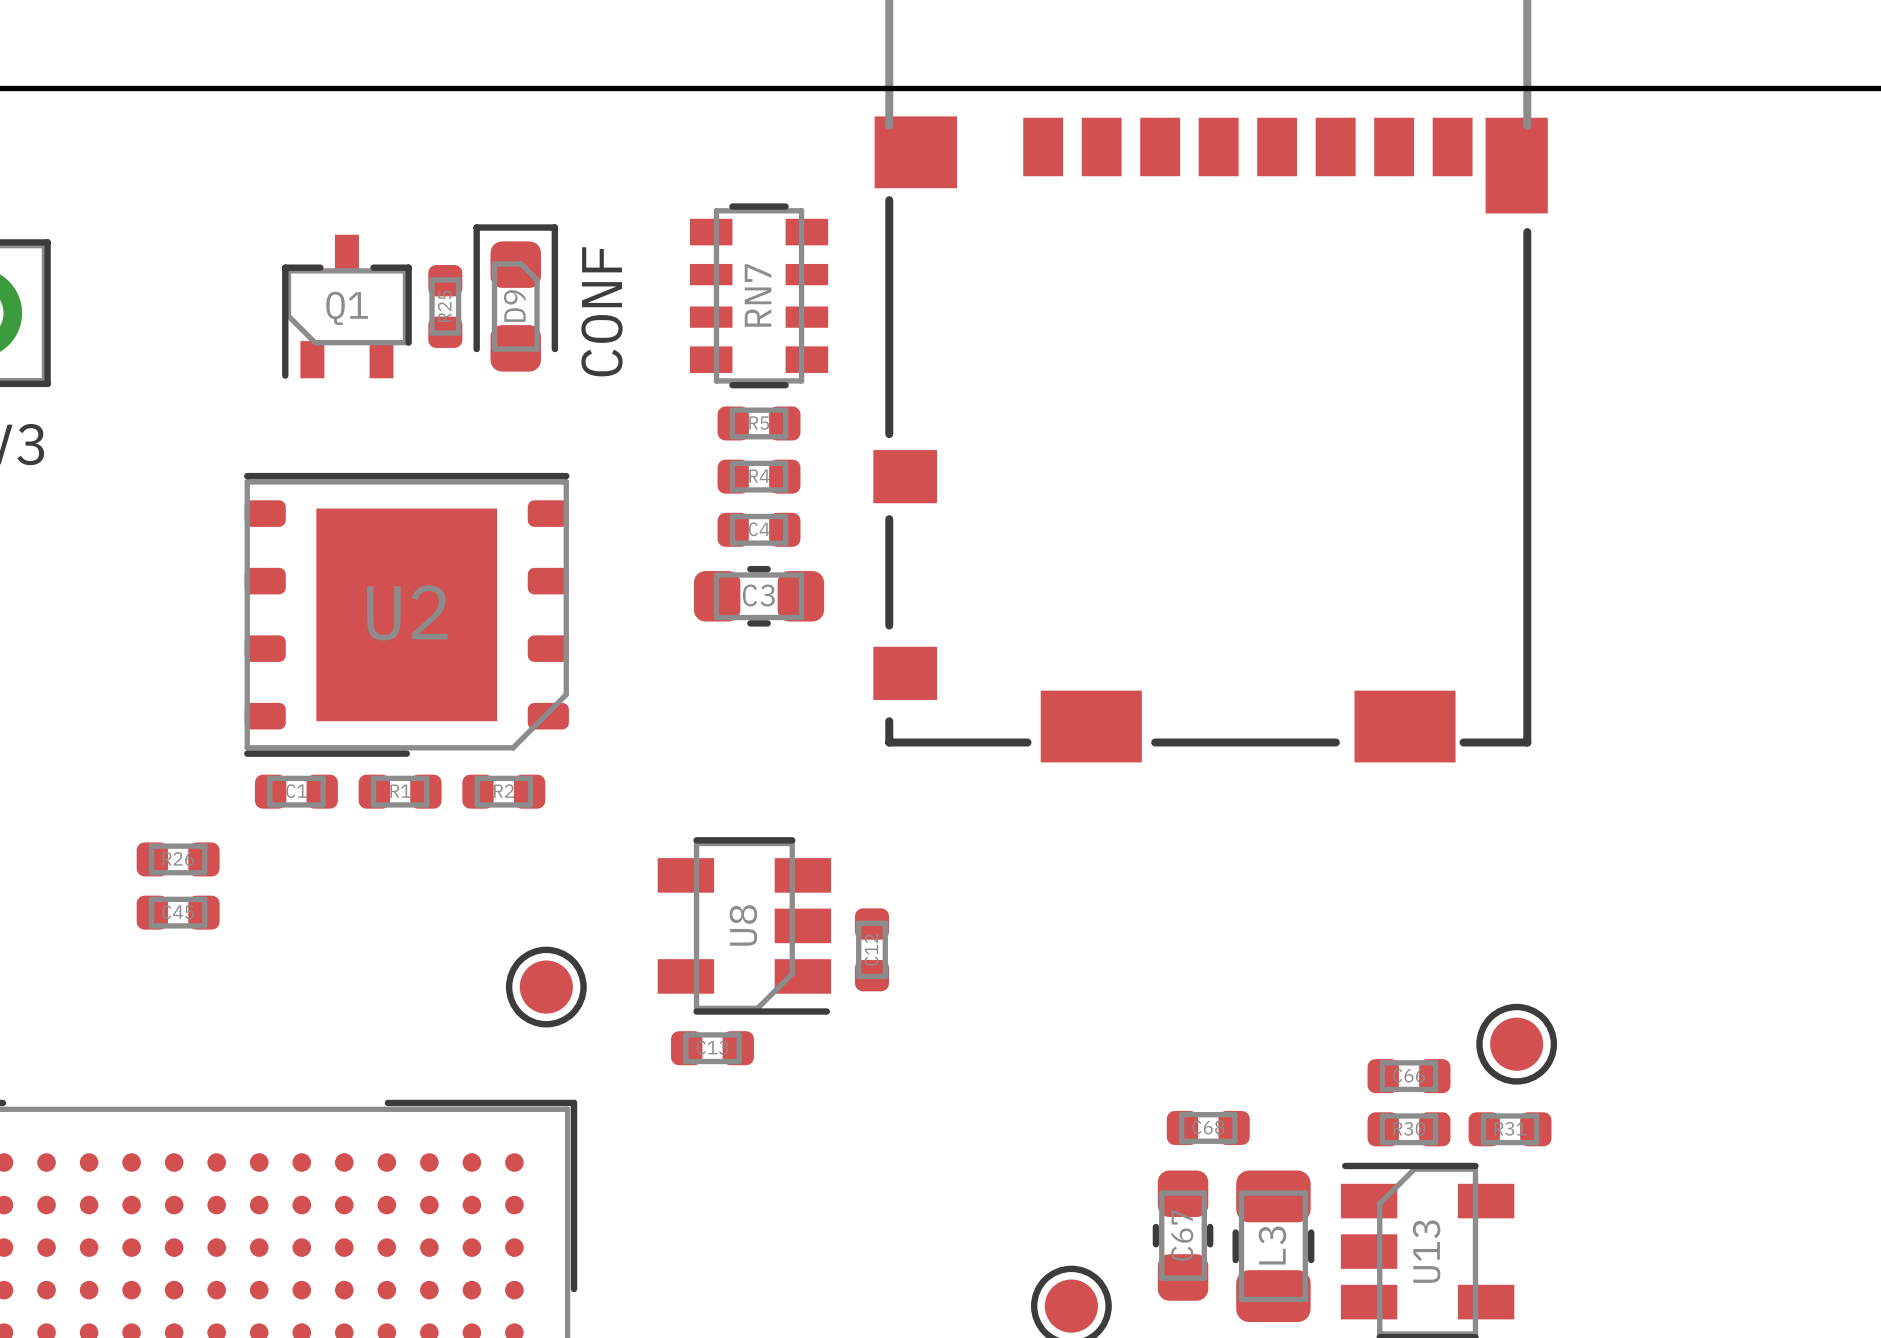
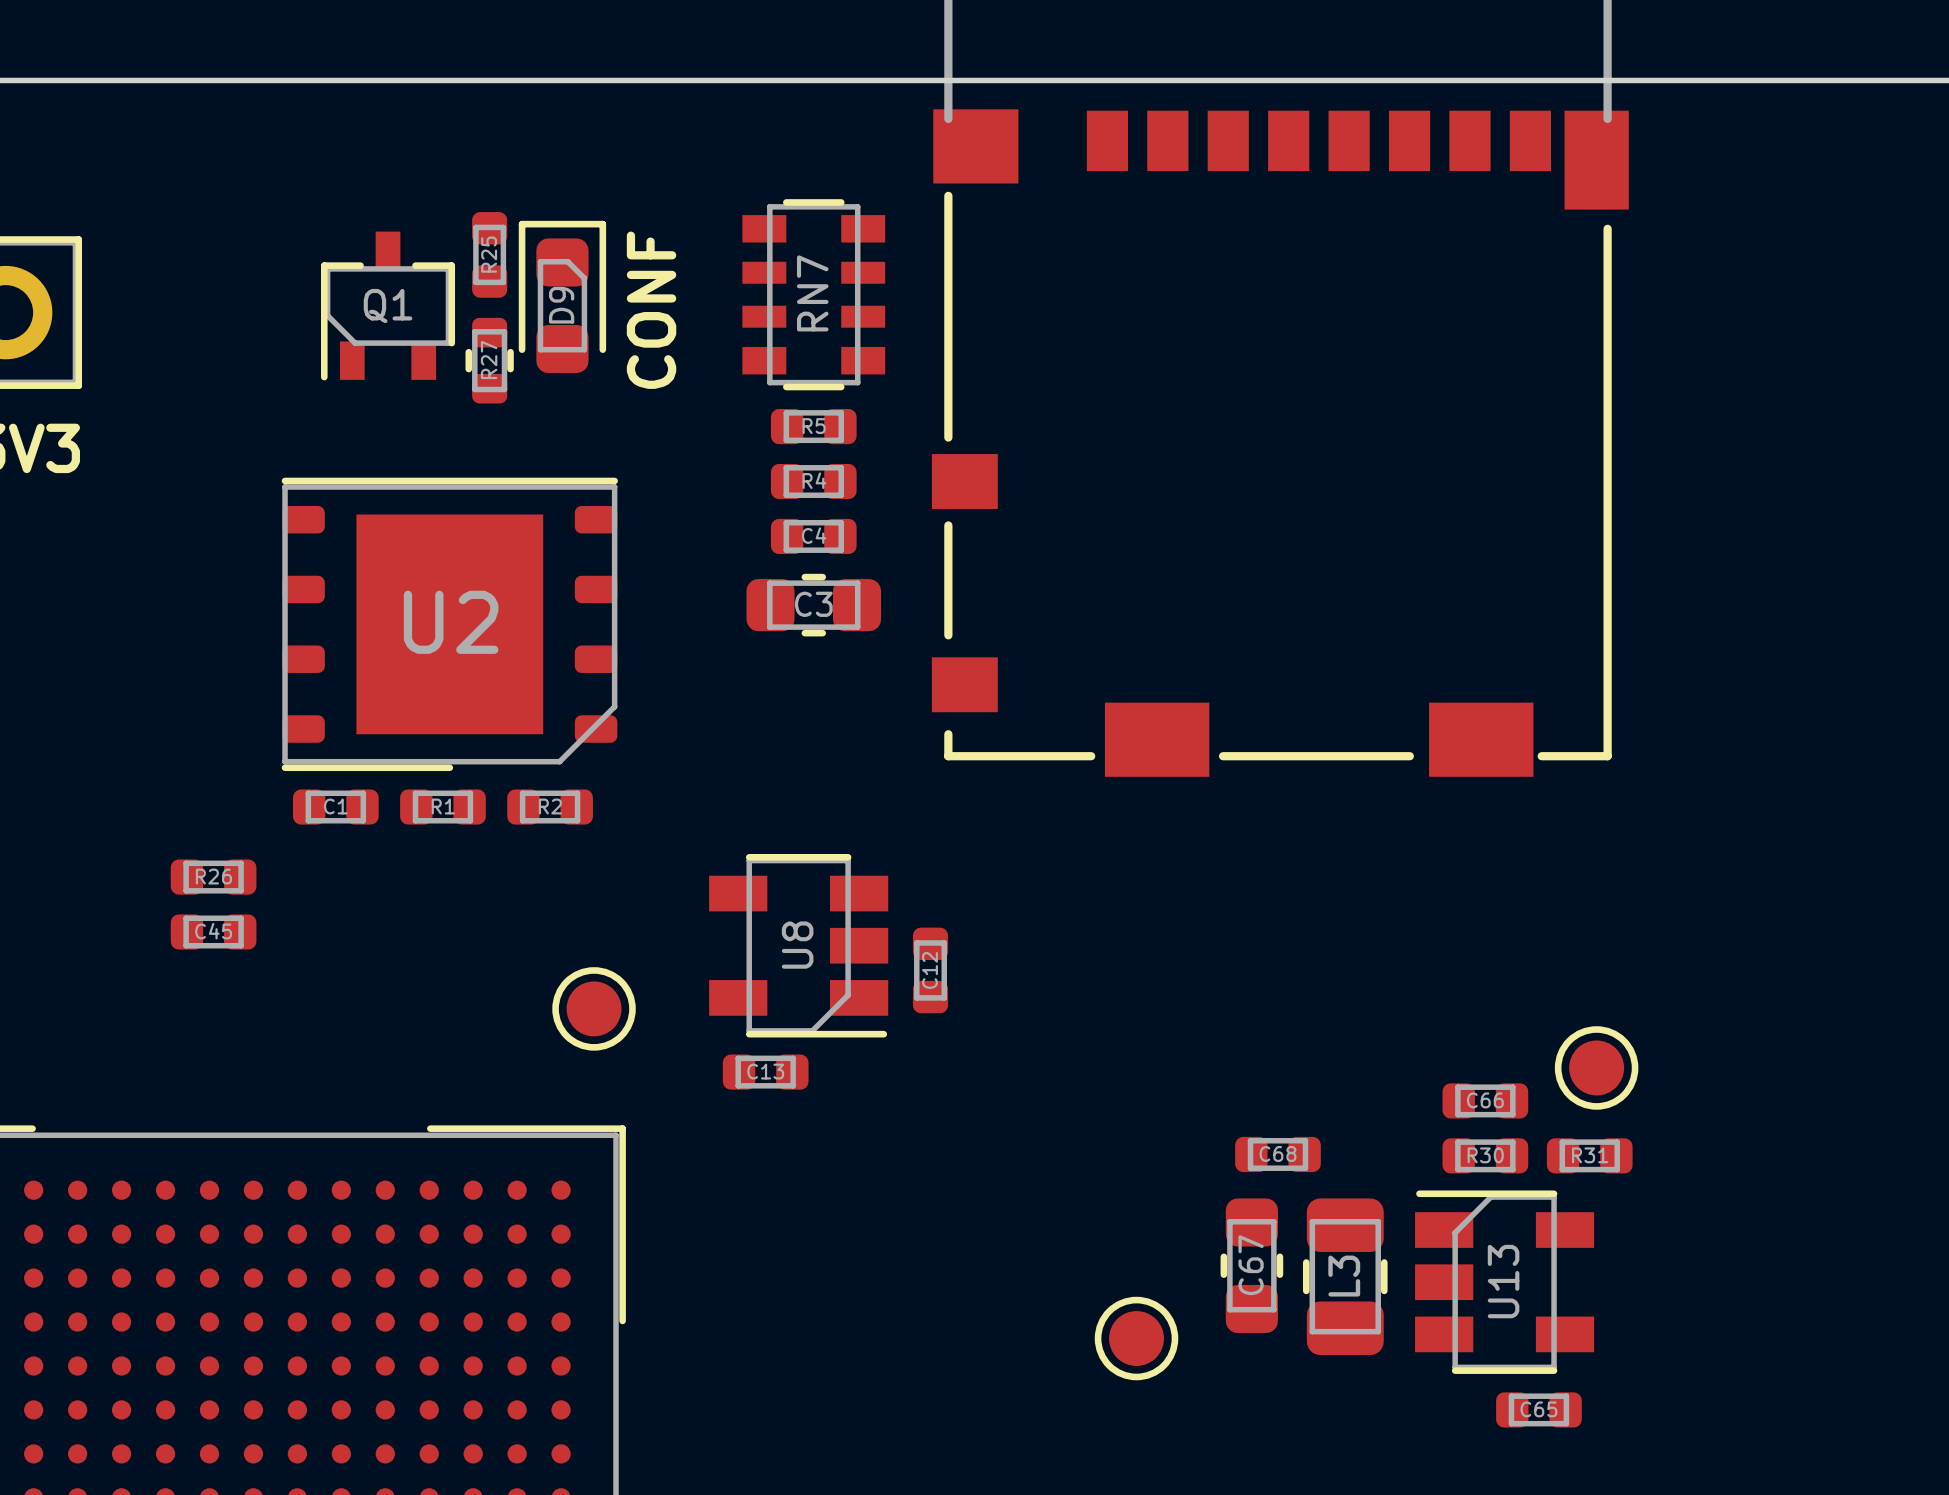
R25 position: (445, 306) -> (489, 254)
R27: none -> (489, 360)

